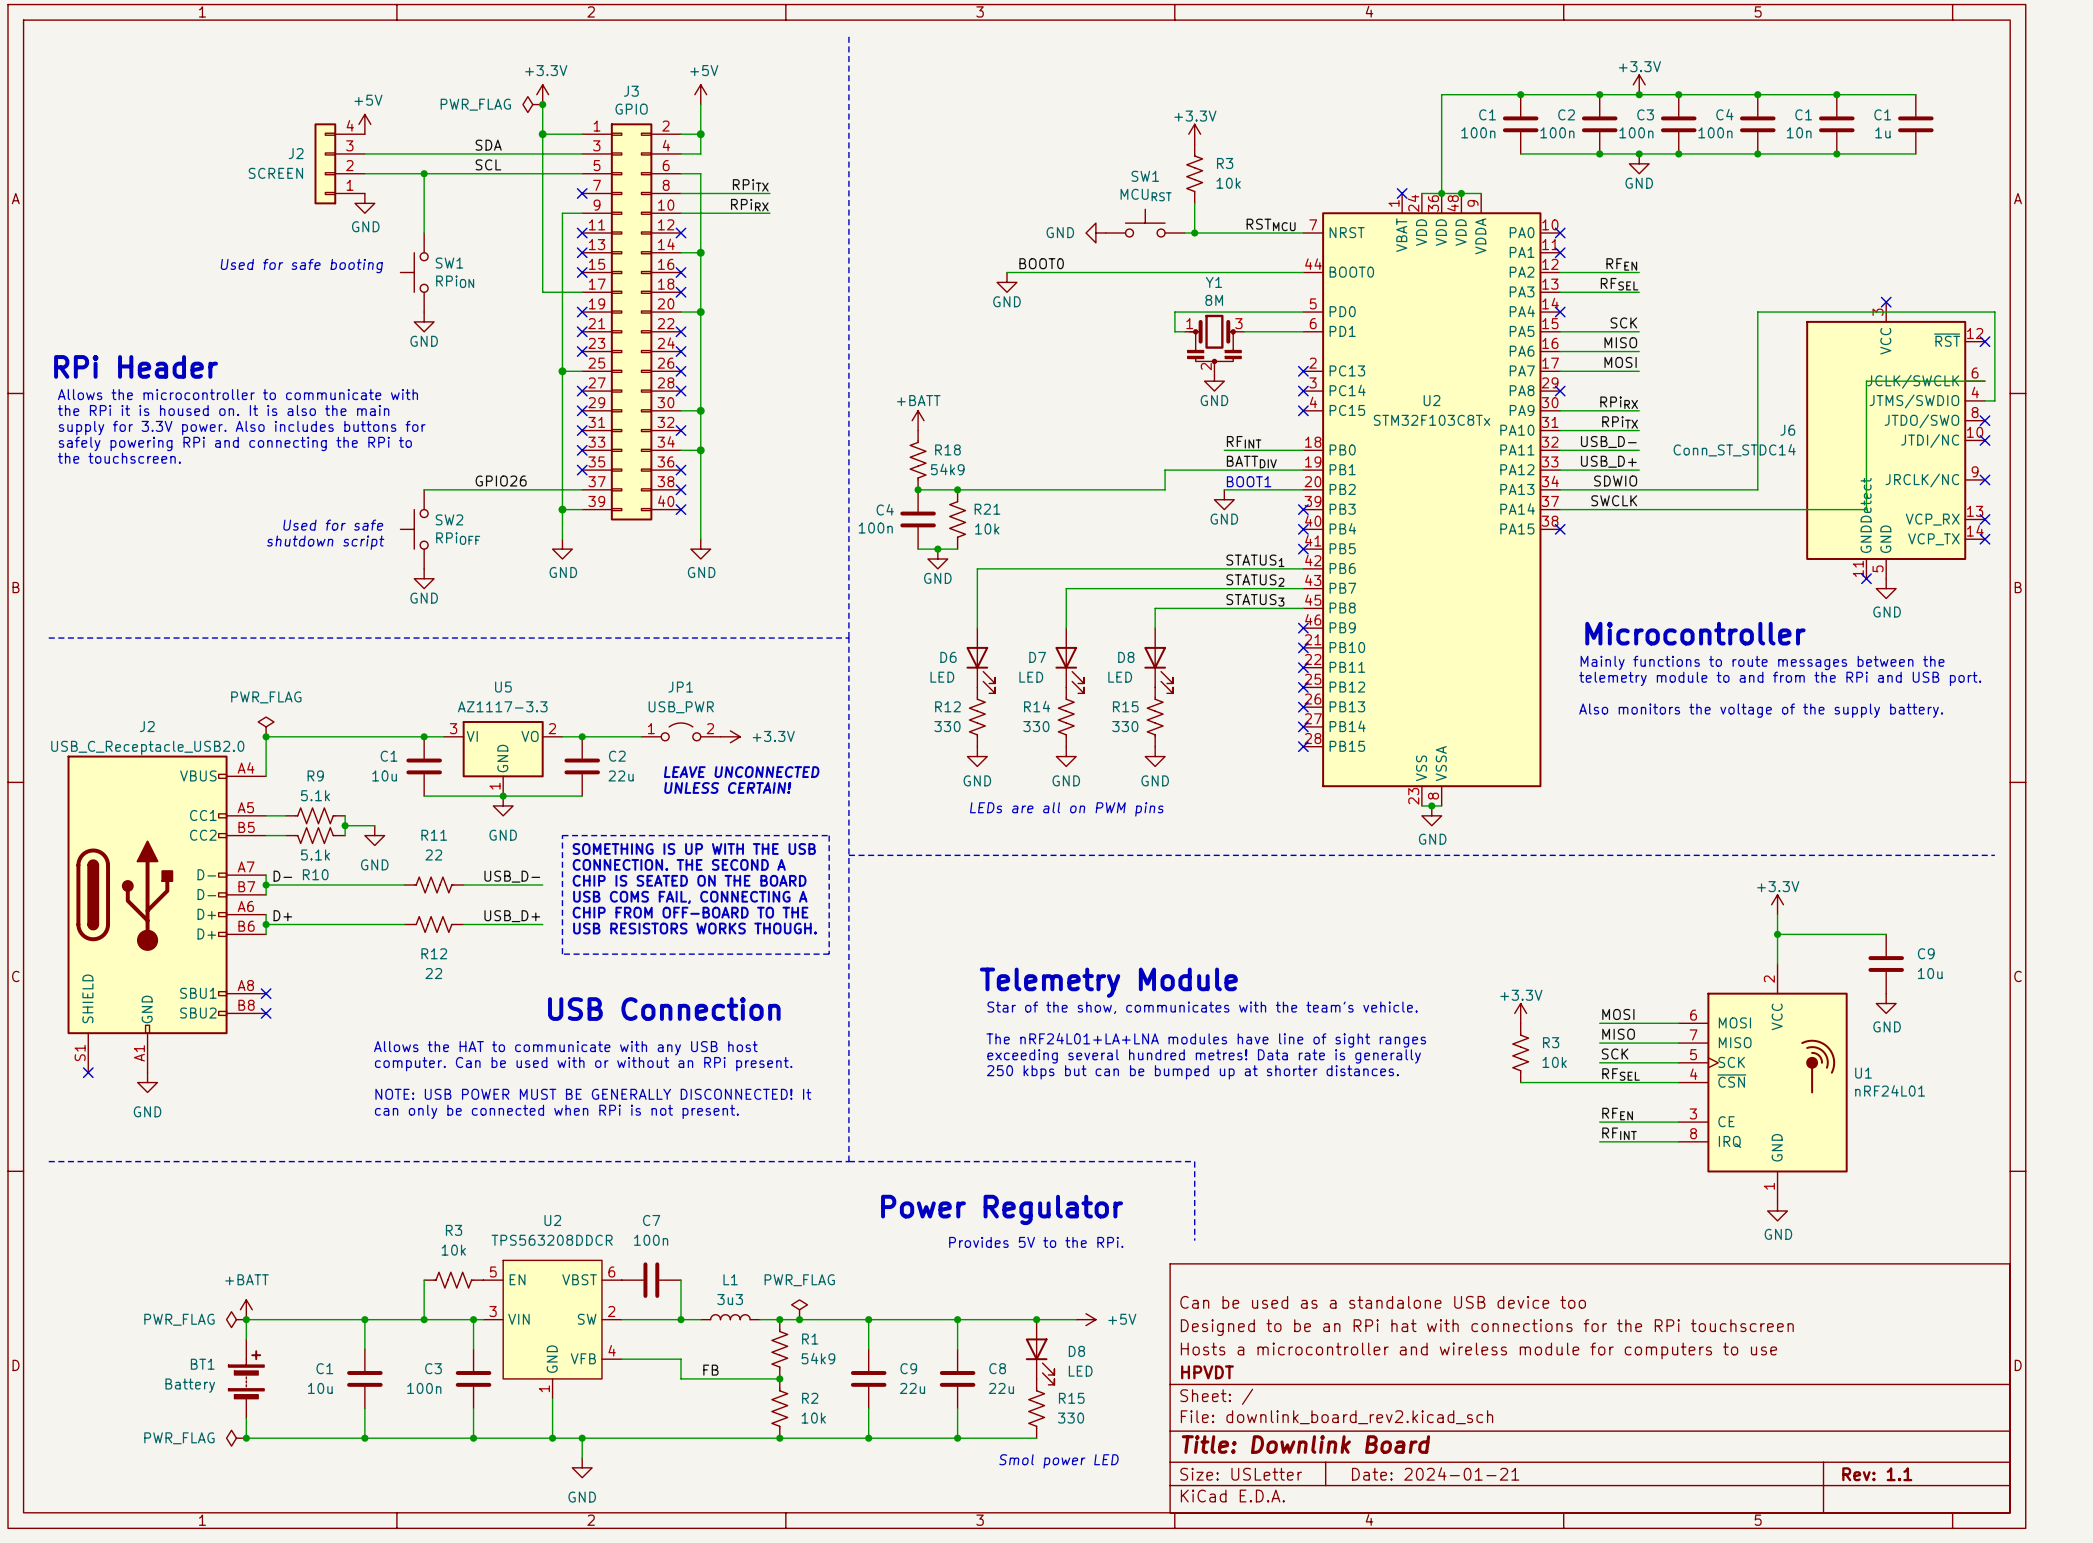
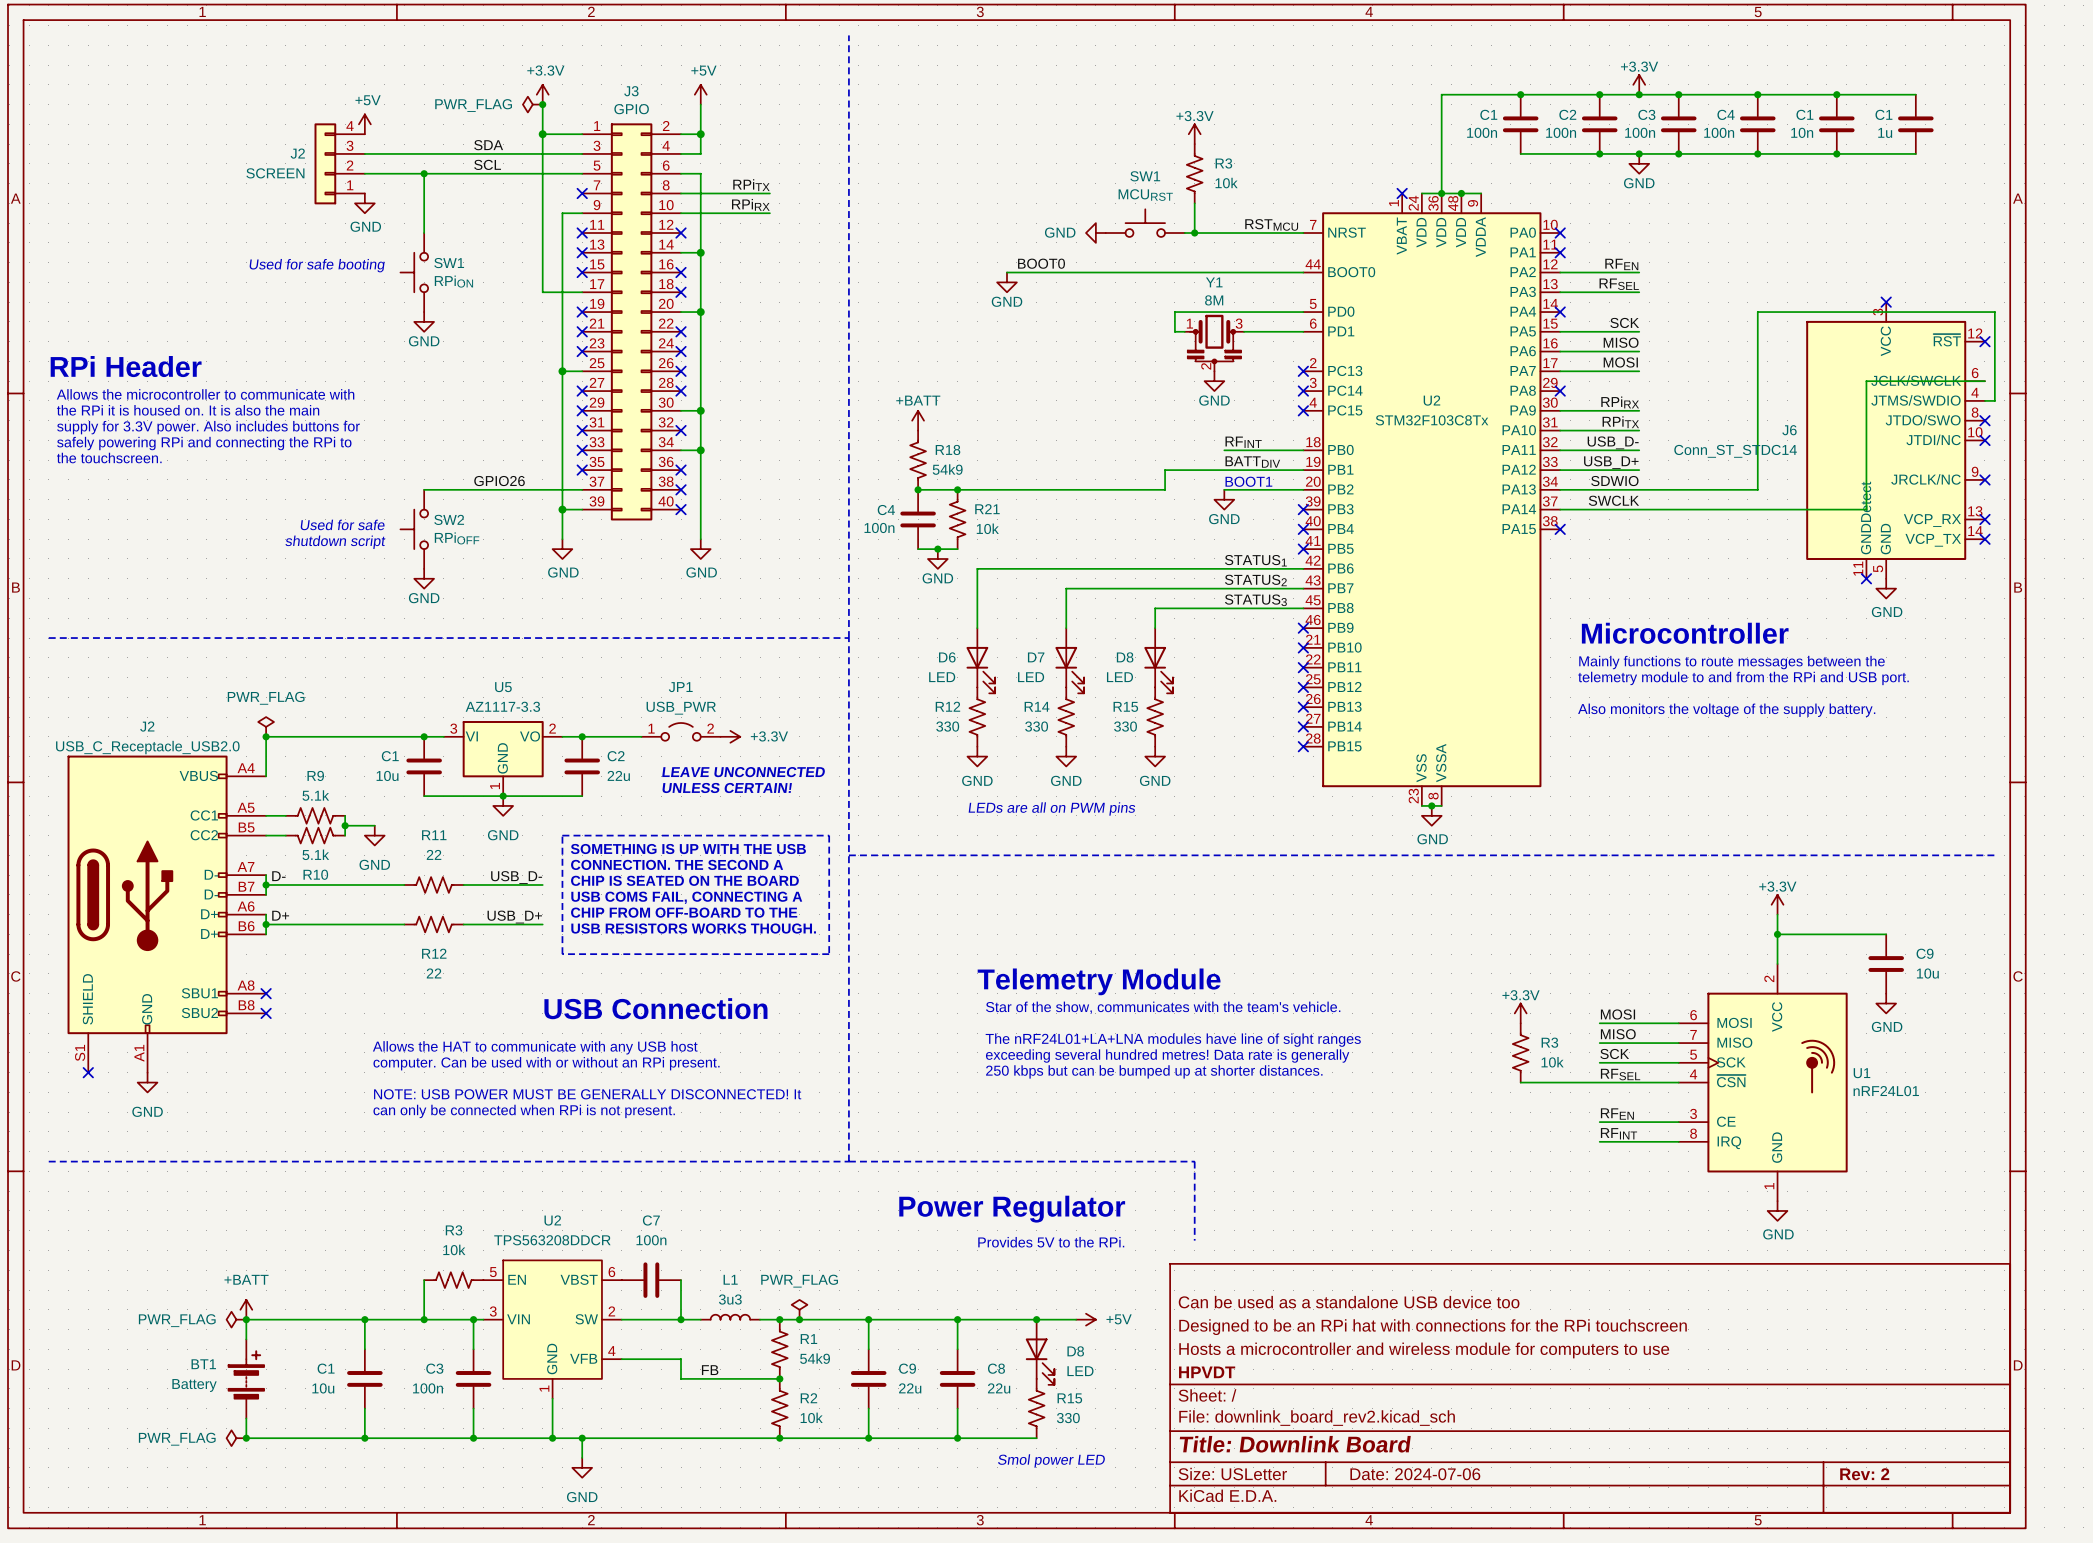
title block: Date: 2024-01-21 (1435, 1473) -> Date: 2024-07-06 (1415, 1474)
title block: Rev: 1.1 (1877, 1474) -> Rev: 2 (1864, 1474)

